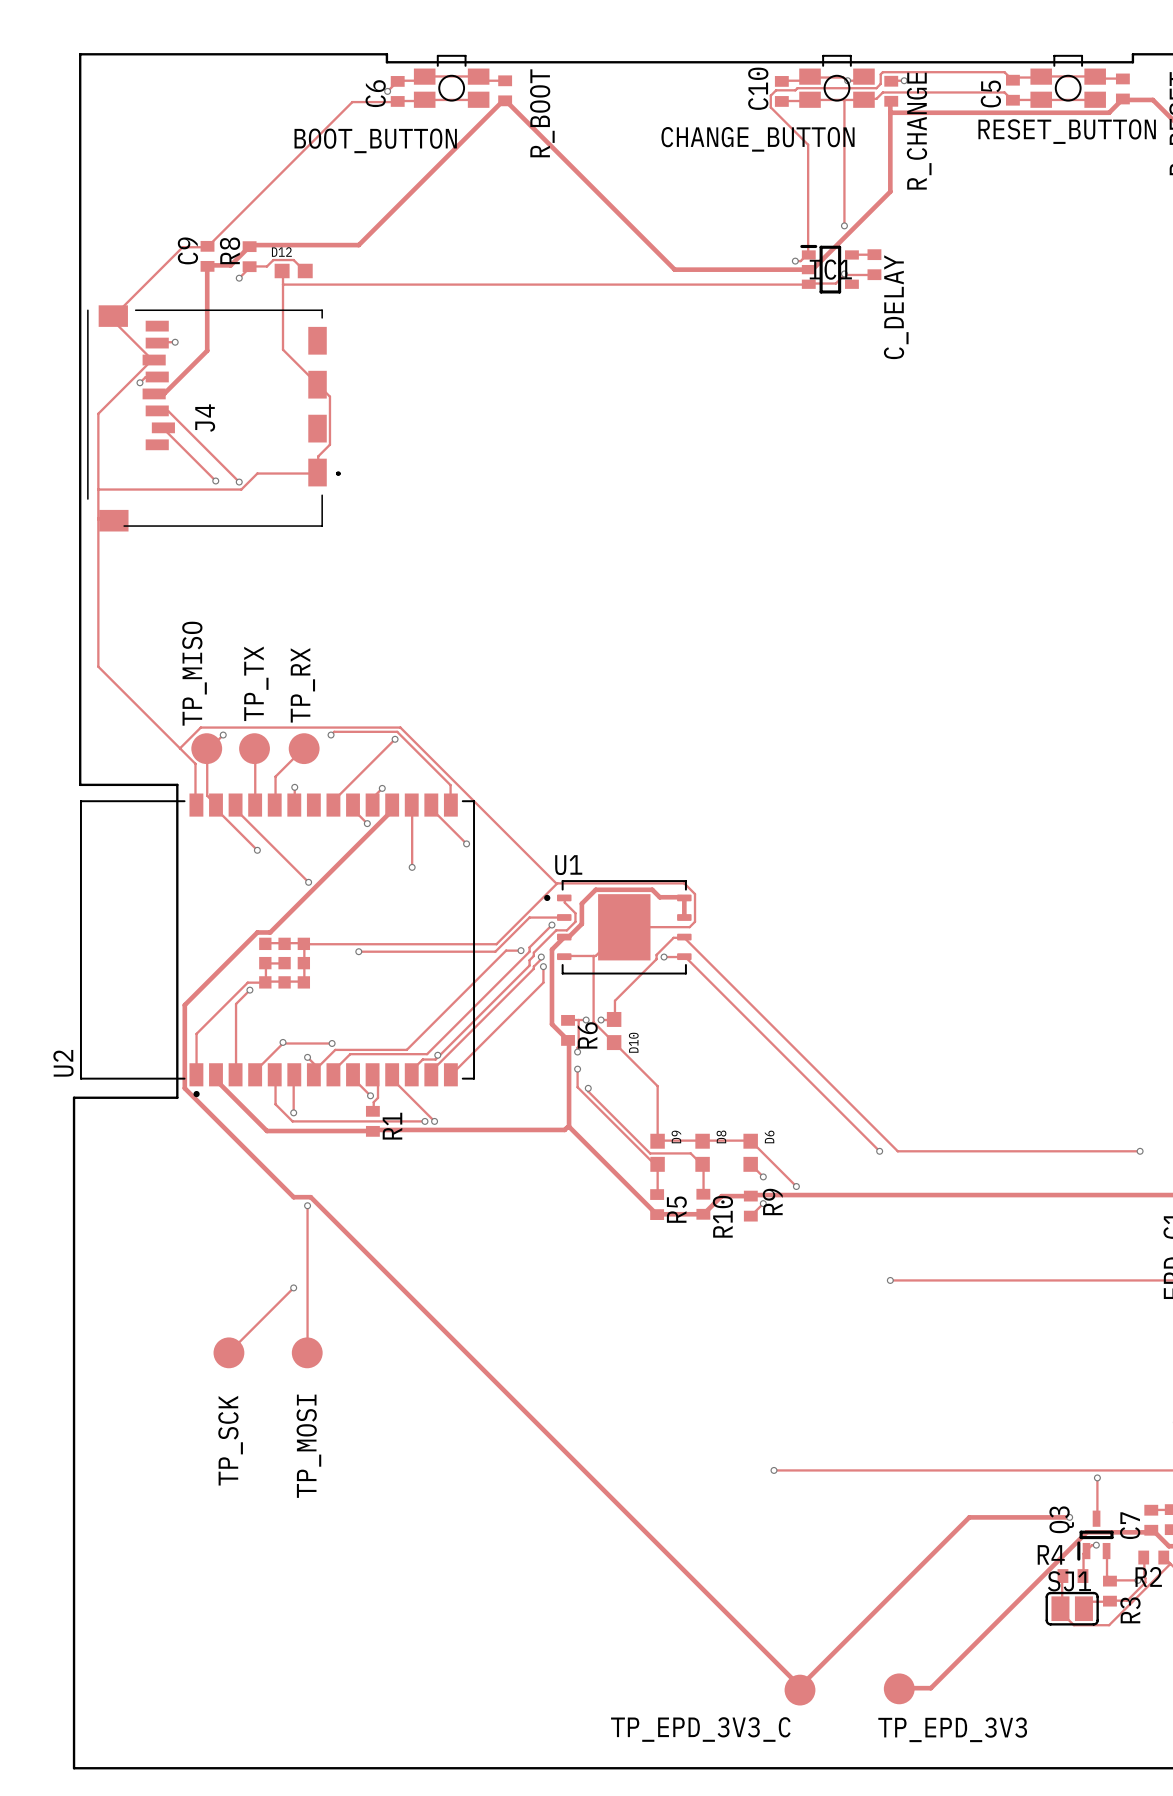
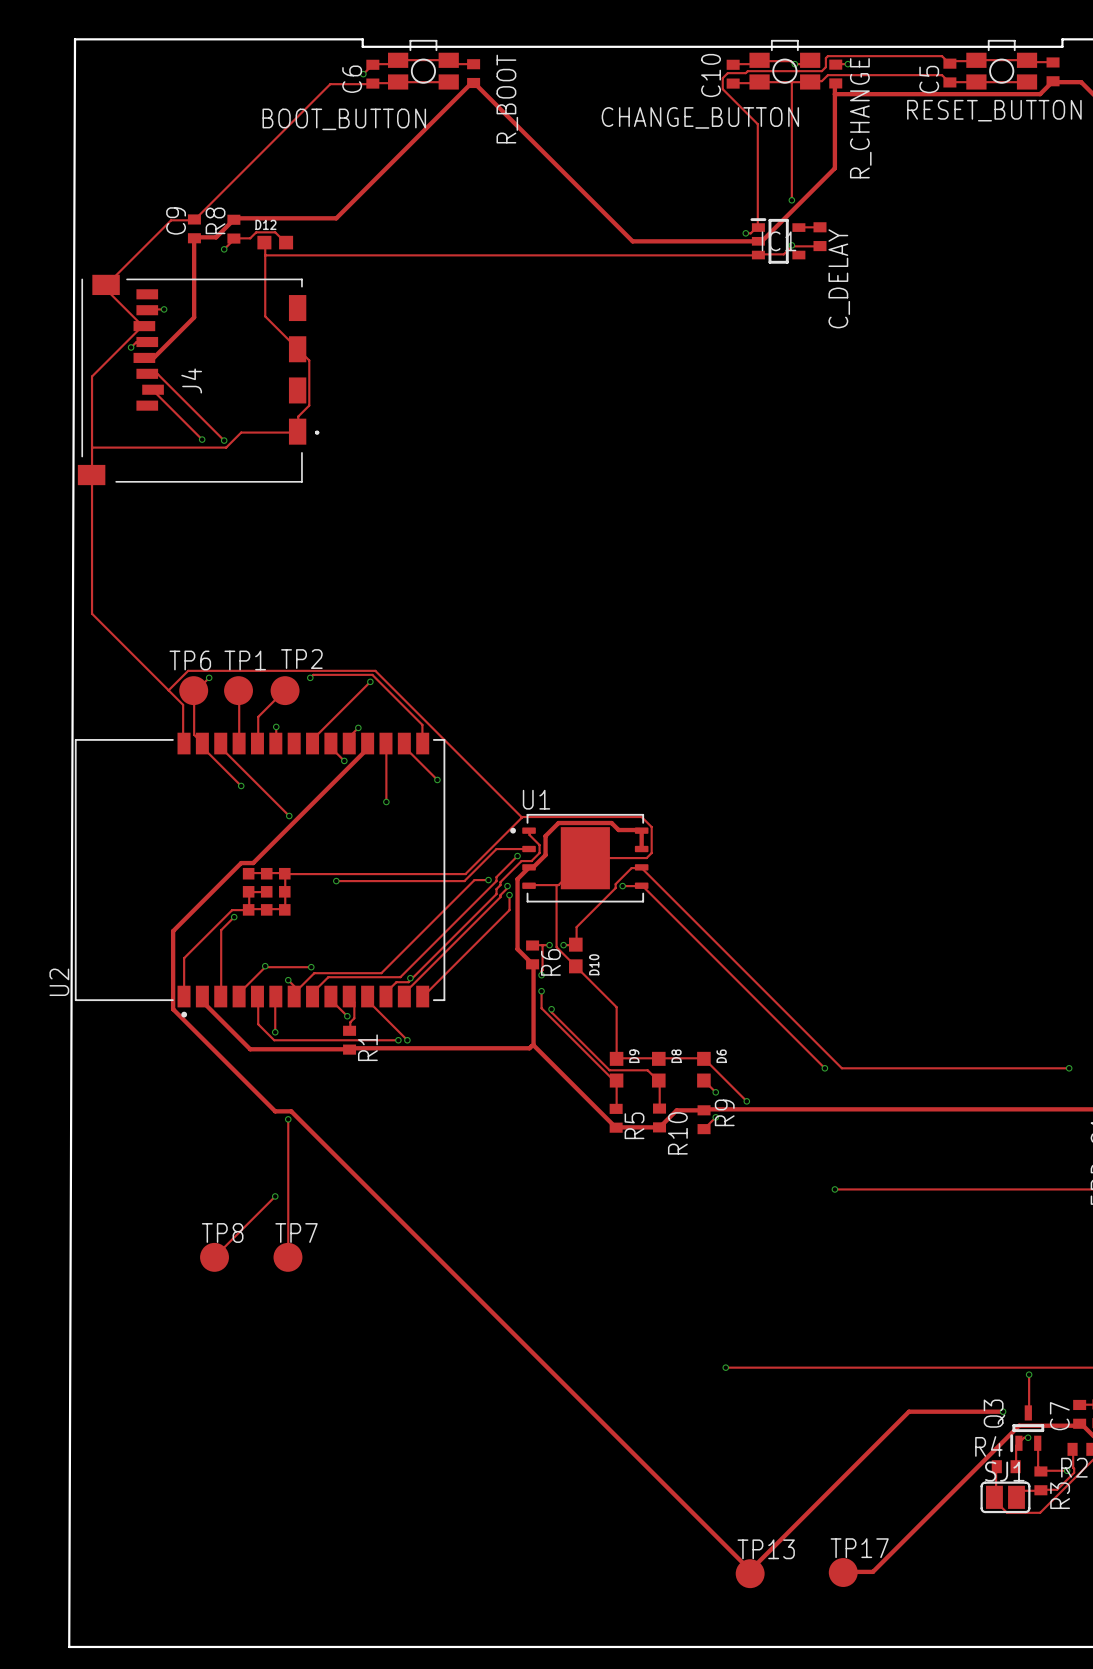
board edge: (80, 54) (80, 784) (177, 784) (177, 1097) (74, 1097) (74, 1768) -> (75, 39) (69, 1646)
J4 footprint: [87, 305, 341, 532] -> [77, 274, 320, 486]
TP_MISO name: TP_MISO (194, 673) -> TP6 (190, 660)
TP_TX name: TP_TX (256, 683) -> TP1 (245, 660)
TP_RX name: TP_RX (302, 685) -> TP2 (301, 659)
TP_SCK name: TP_SCK (230, 1440) -> TP8 (222, 1232)
TP_MOSI name: TP_MOSI (308, 1446) -> TP7 (296, 1232)
TP_EPD_3V3_C name: TP_EPD_3V3_C (700, 1729) -> TP13 (766, 1549)
TP_EPD_3V3 name: TP_EPD_3V3 (952, 1729) -> TP17 (859, 1548)

